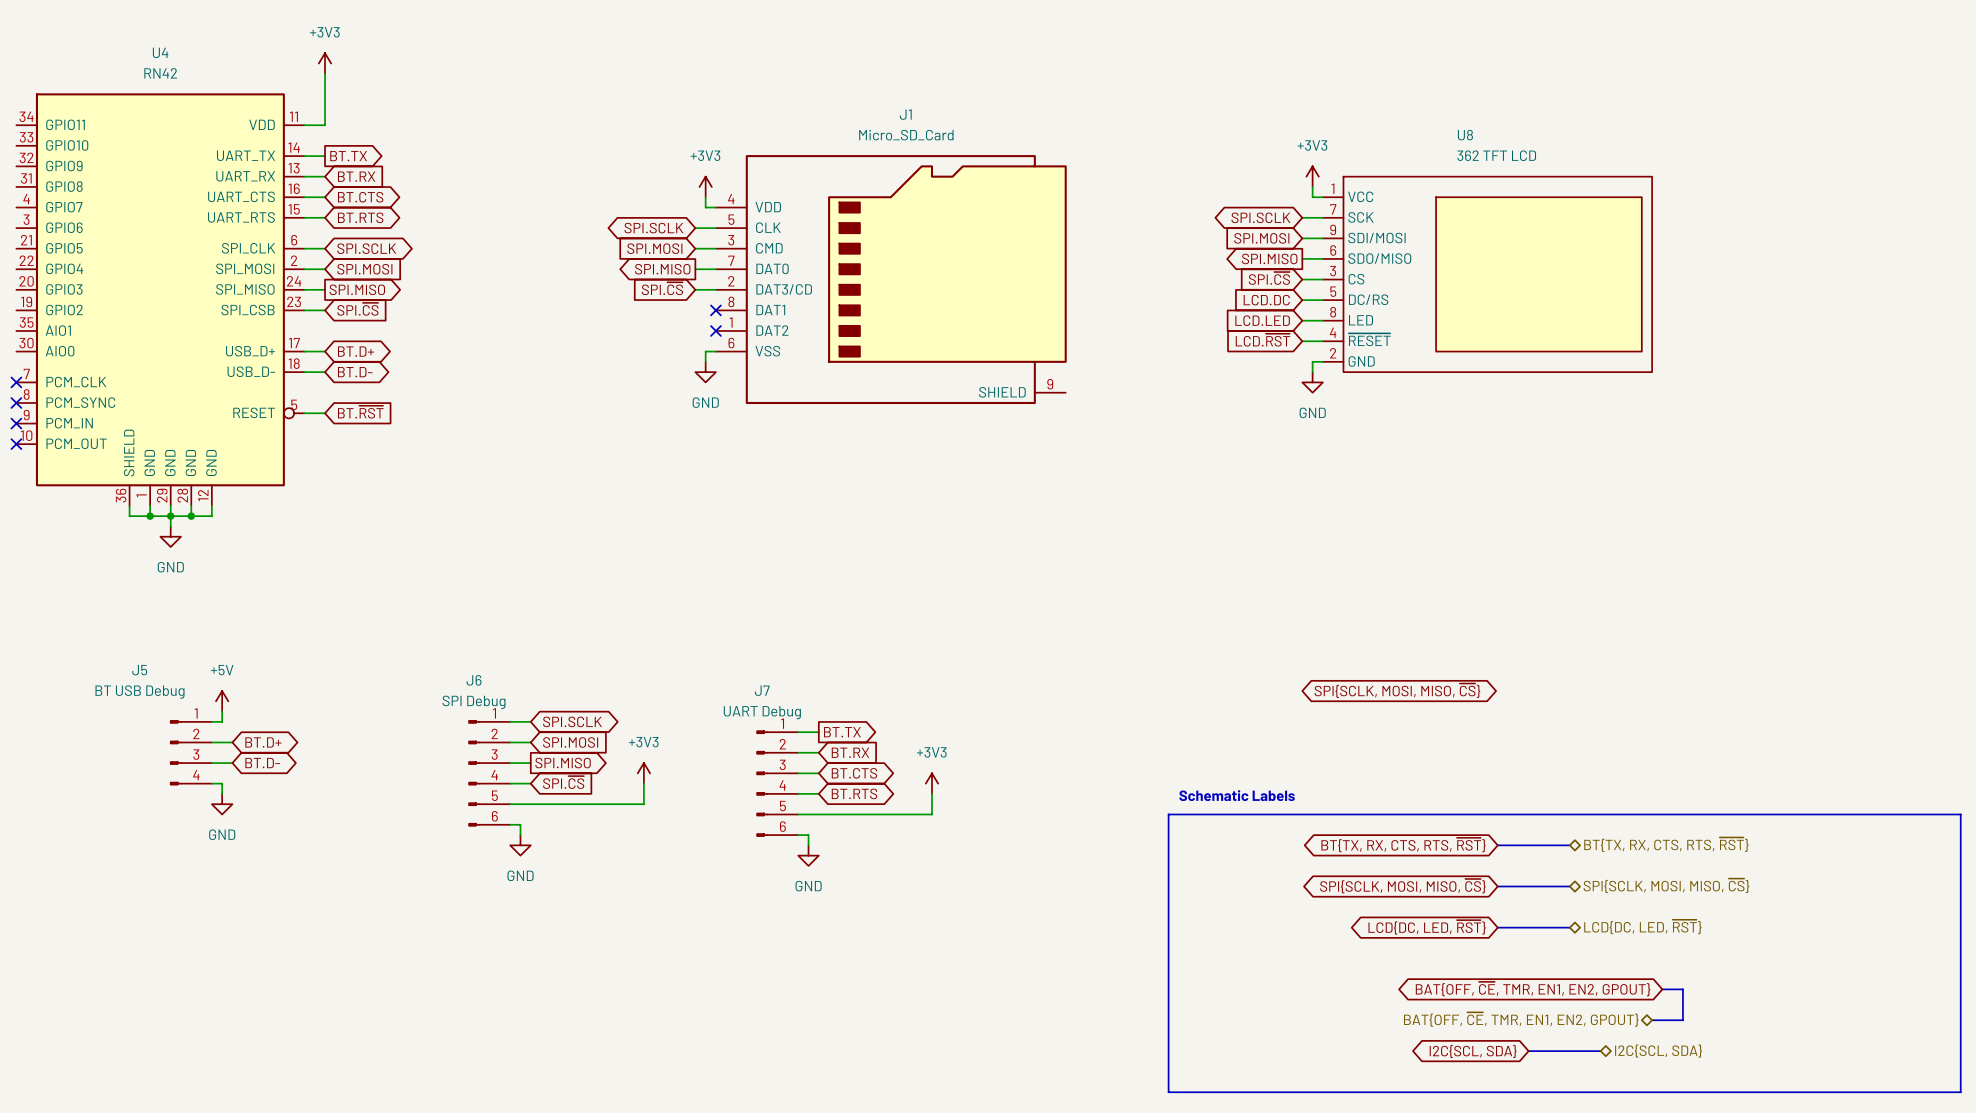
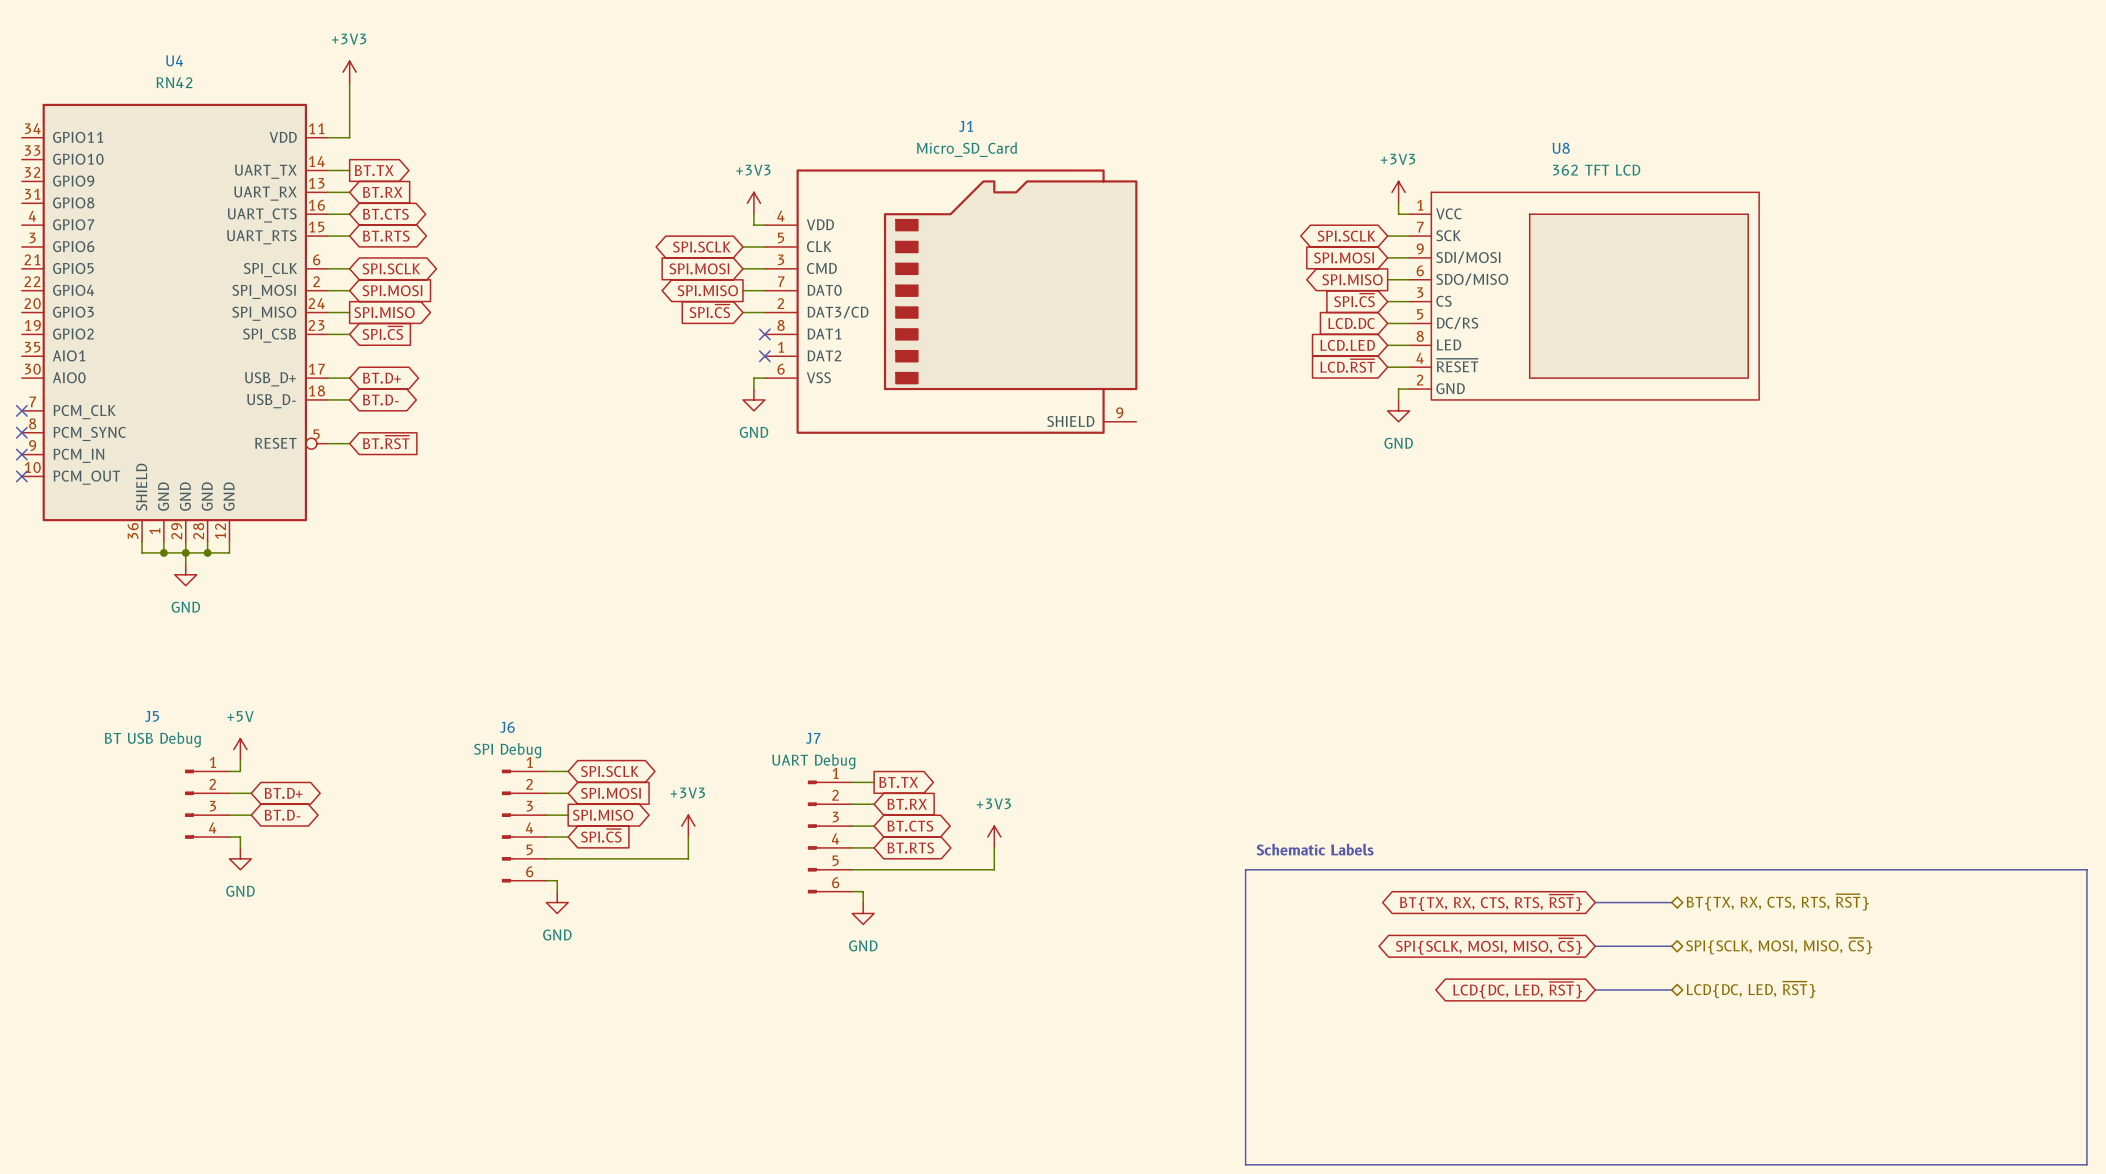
global label: SPI{SCLK, MOSI, MISO, ~{CS}} (1397, 690) -> none
global label: BAT{OFF, ~{CE}, TMR, EN1, EN2, GPOUT} (1533, 989) -> none
bus: (1662, 989) (1682, 989) (1682, 1020) (1652, 1020) -> none
hierarchical label: BAT{OFF, ~{CE}, TMR, EN1, EN2, GPOUT} (1521, 1019) -> none
global label: I2C{SCL, SDA} (1473, 1051) -> none
bus: (1528, 1051) (1600, 1051) -> none
hierarchical label: I2C{SCL, SDA} (1658, 1051) -> none

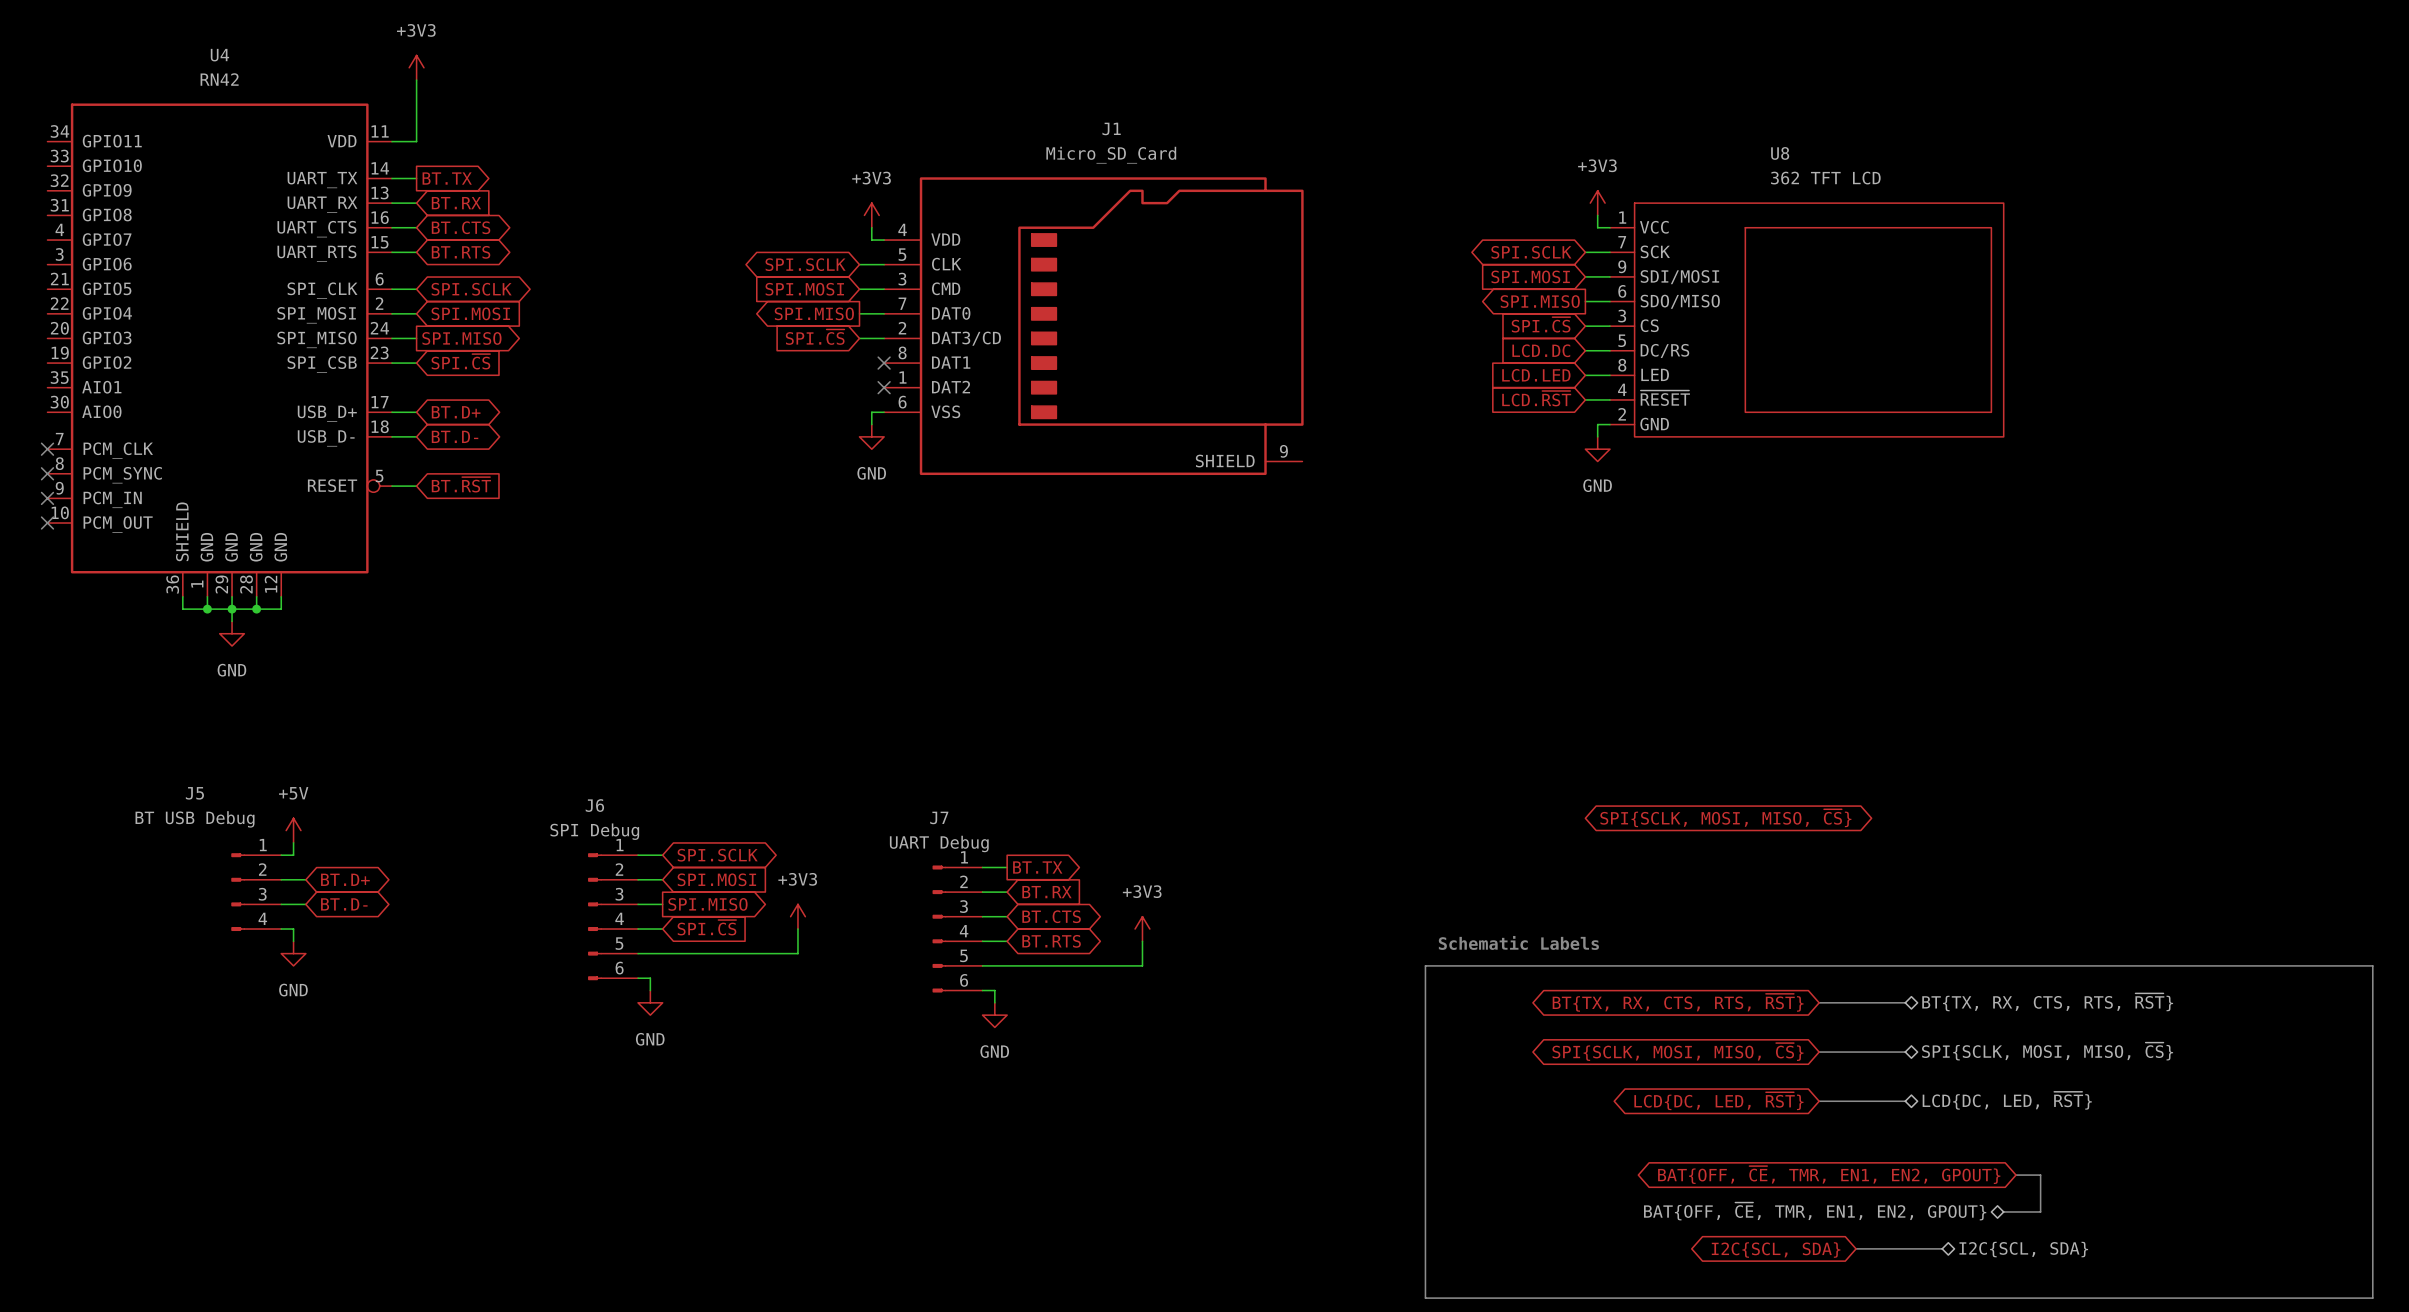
global label: none -> SPI{SCLK, MOSI, MISO, ~{CS}} (1725, 818)
global label: none -> BAT{OFF, ~{CE}, TMR, EN1, EN2, GPOUT} (1829, 1175)
bus: none -> (2016, 1175) (2040, 1175) (2040, 1211) (2003, 1211)
hierarchical label: none -> BAT{OFF, ~{CE}, TMR, EN1, EN2, GPOUT} (1815, 1211)
bus: none -> (1856, 1248) (1942, 1248)
global label: none -> I2C{SCL, SDA} (1776, 1250)
hierarchical label: none -> I2C{SCL, SDA} (2023, 1249)

